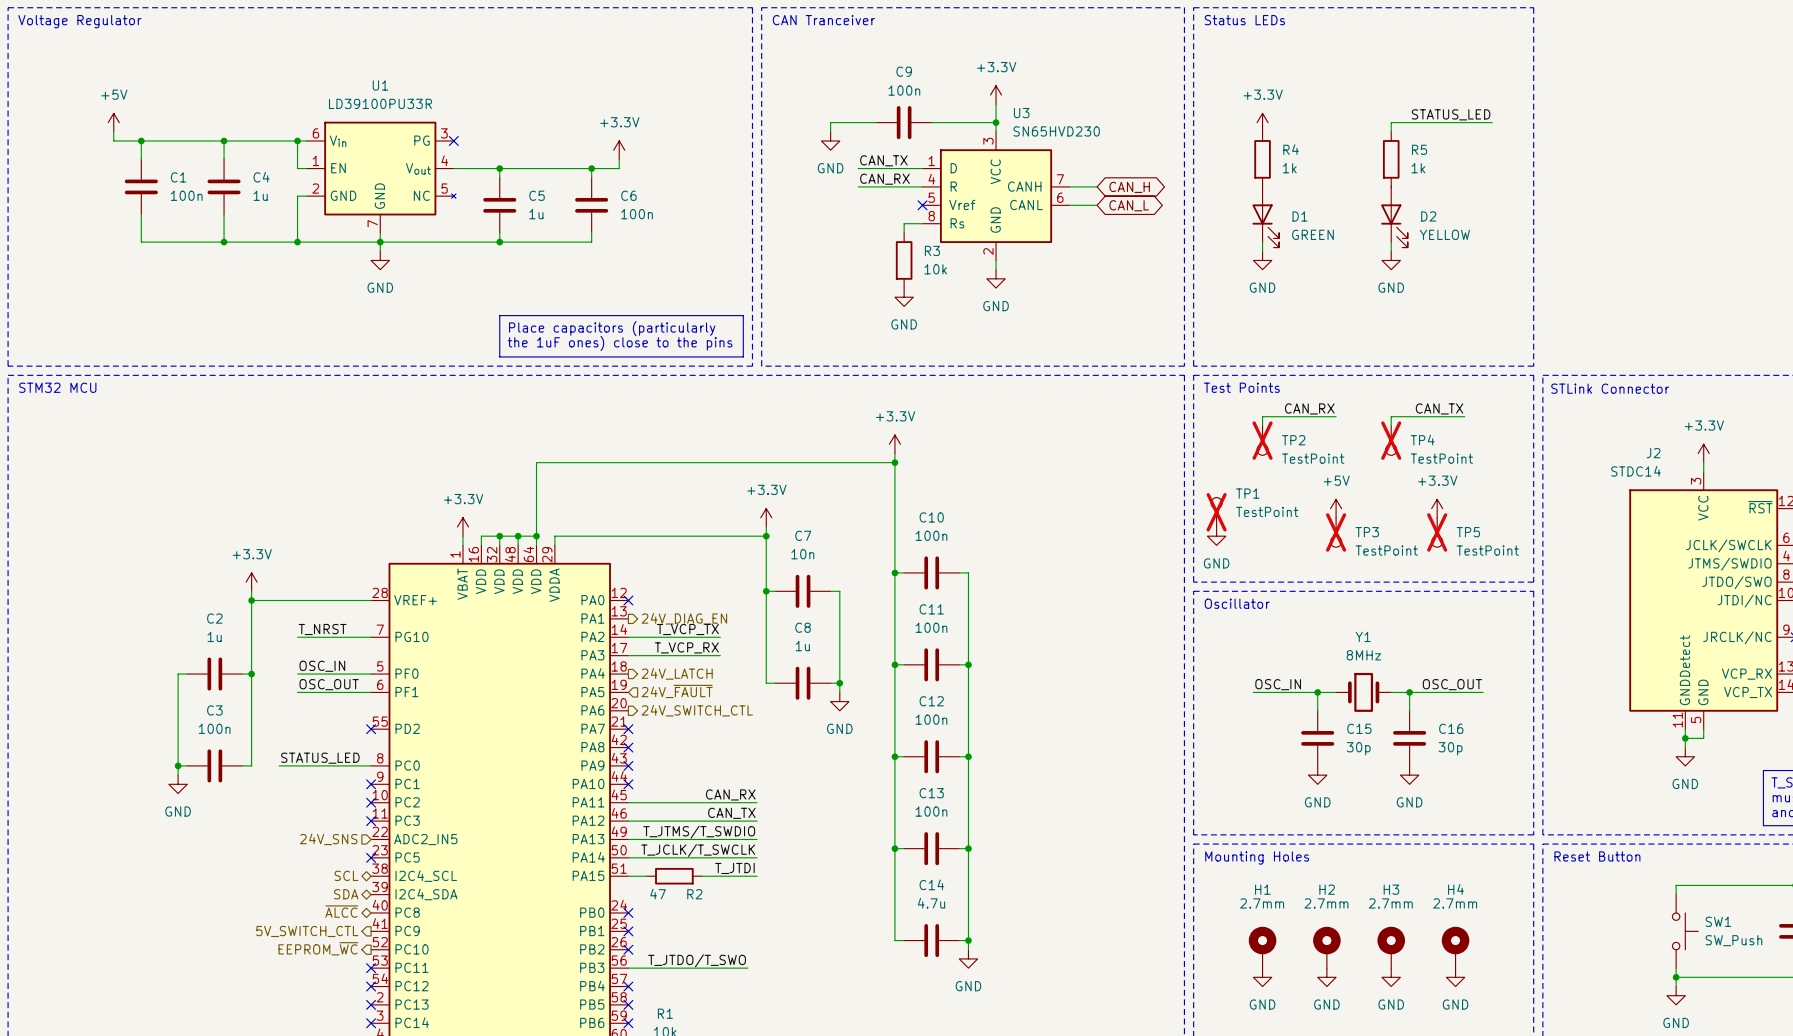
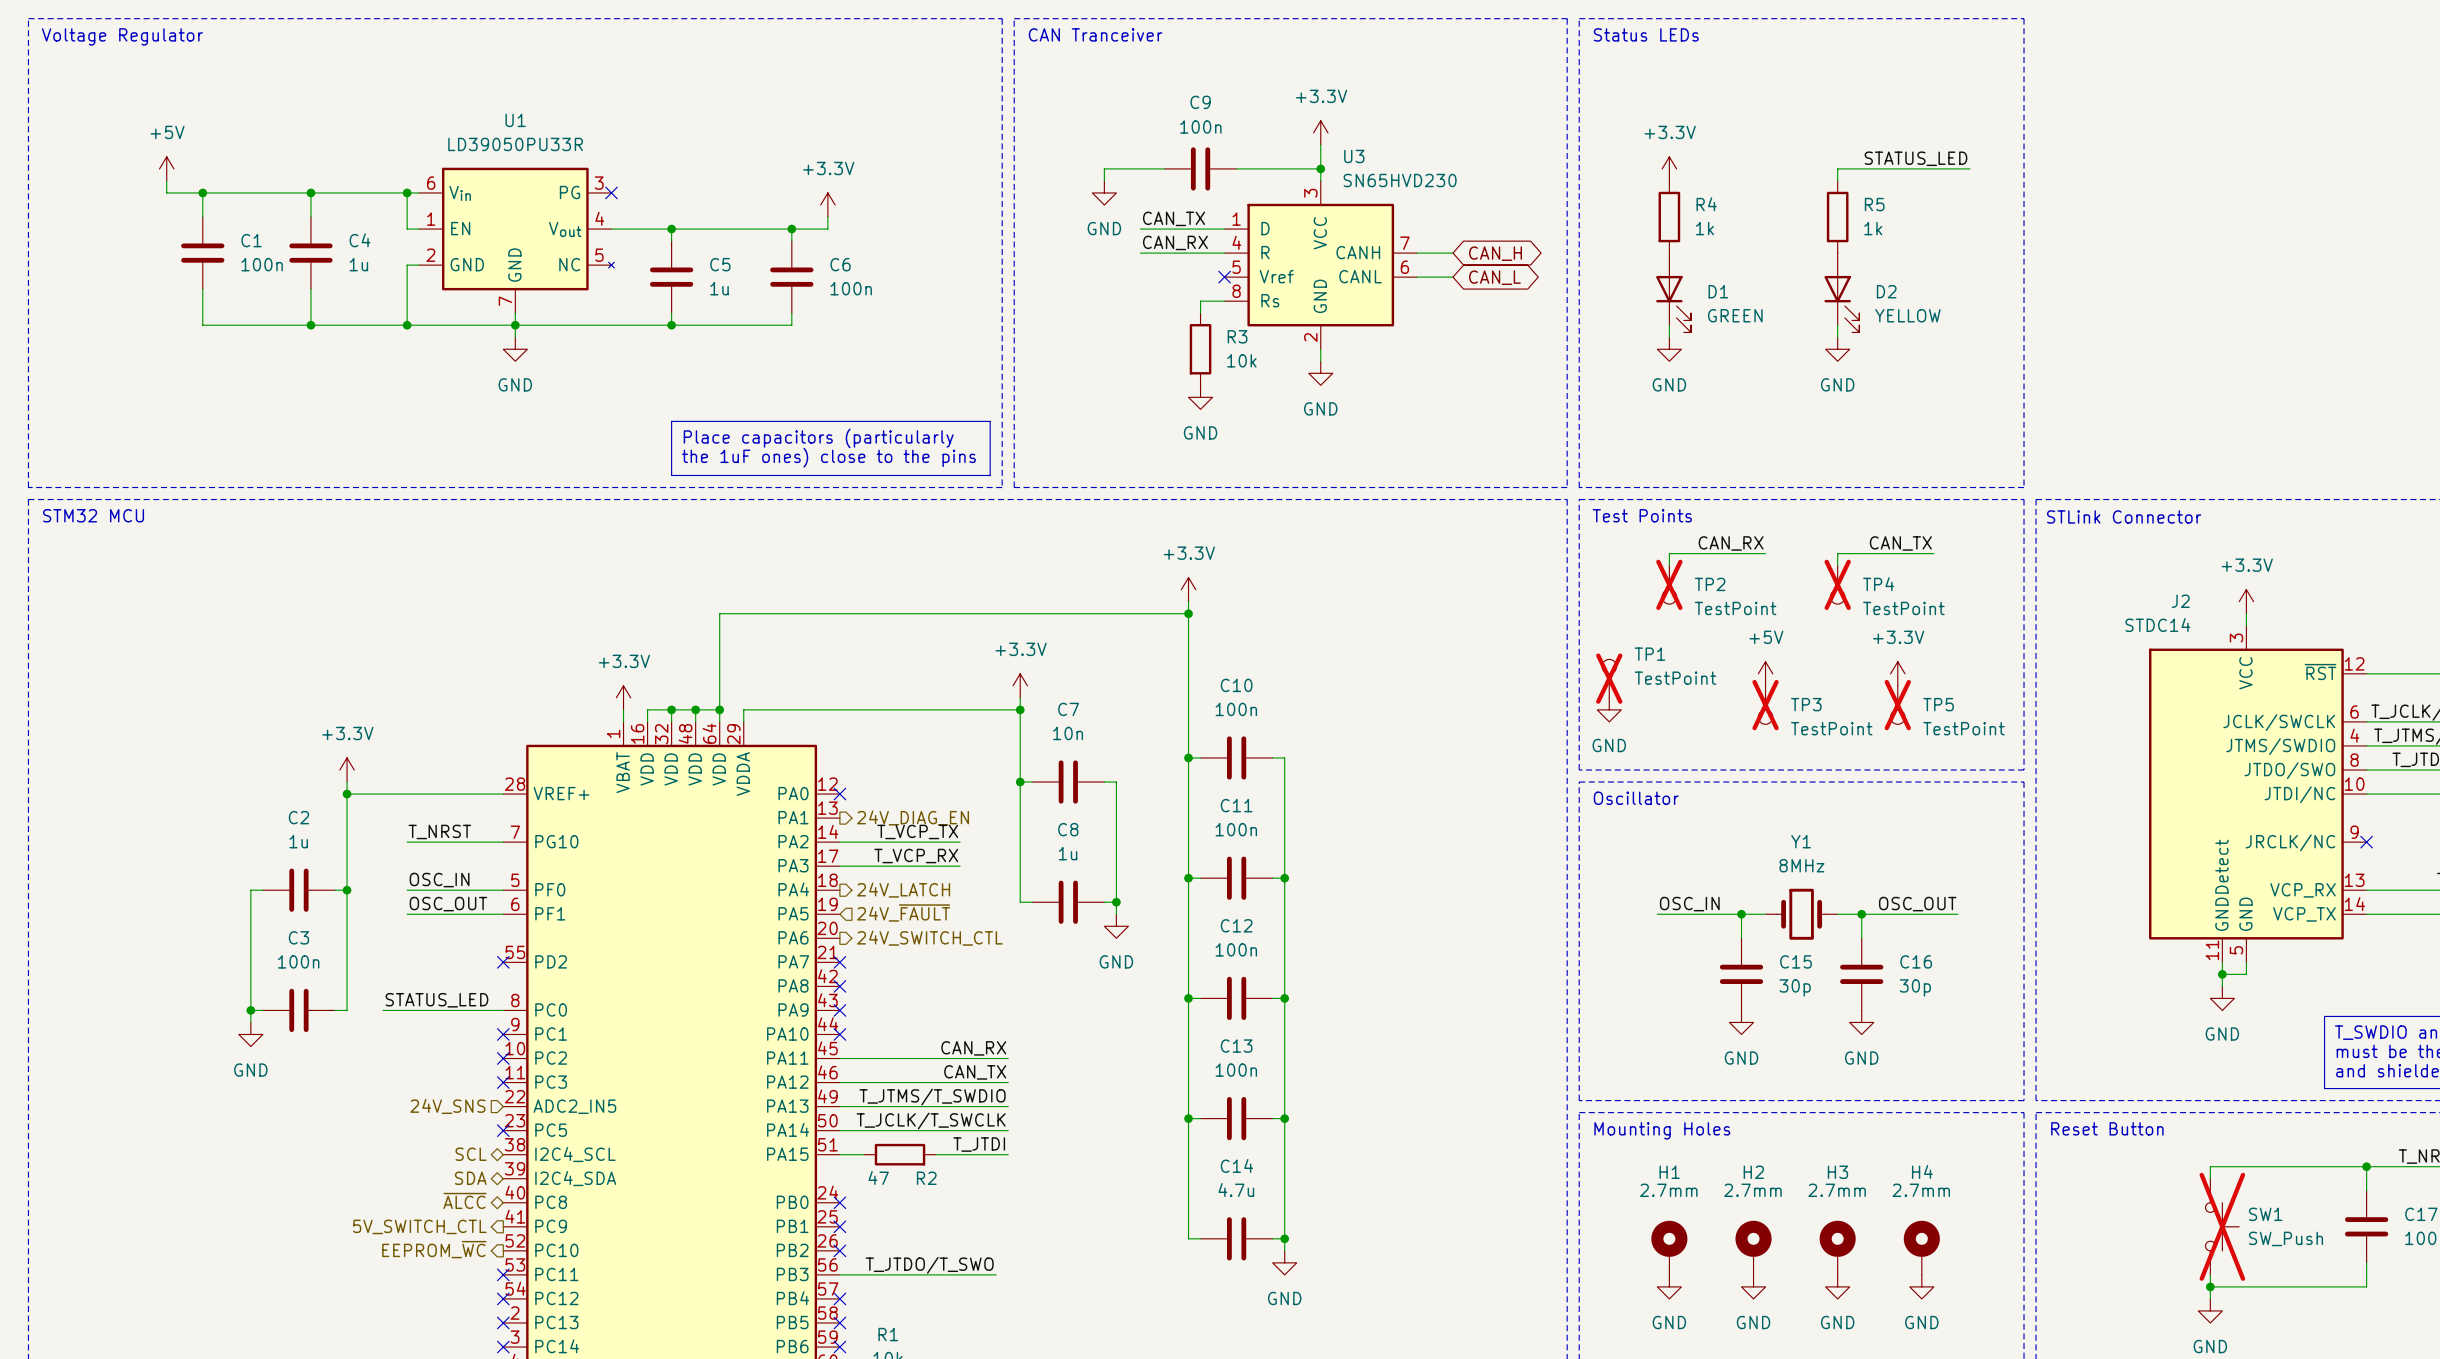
U1 value: LD39100PU33R (380, 103) -> LD39050PU33R (515, 144)
SW1 do-not-place cross: none -> (2222, 1226)

